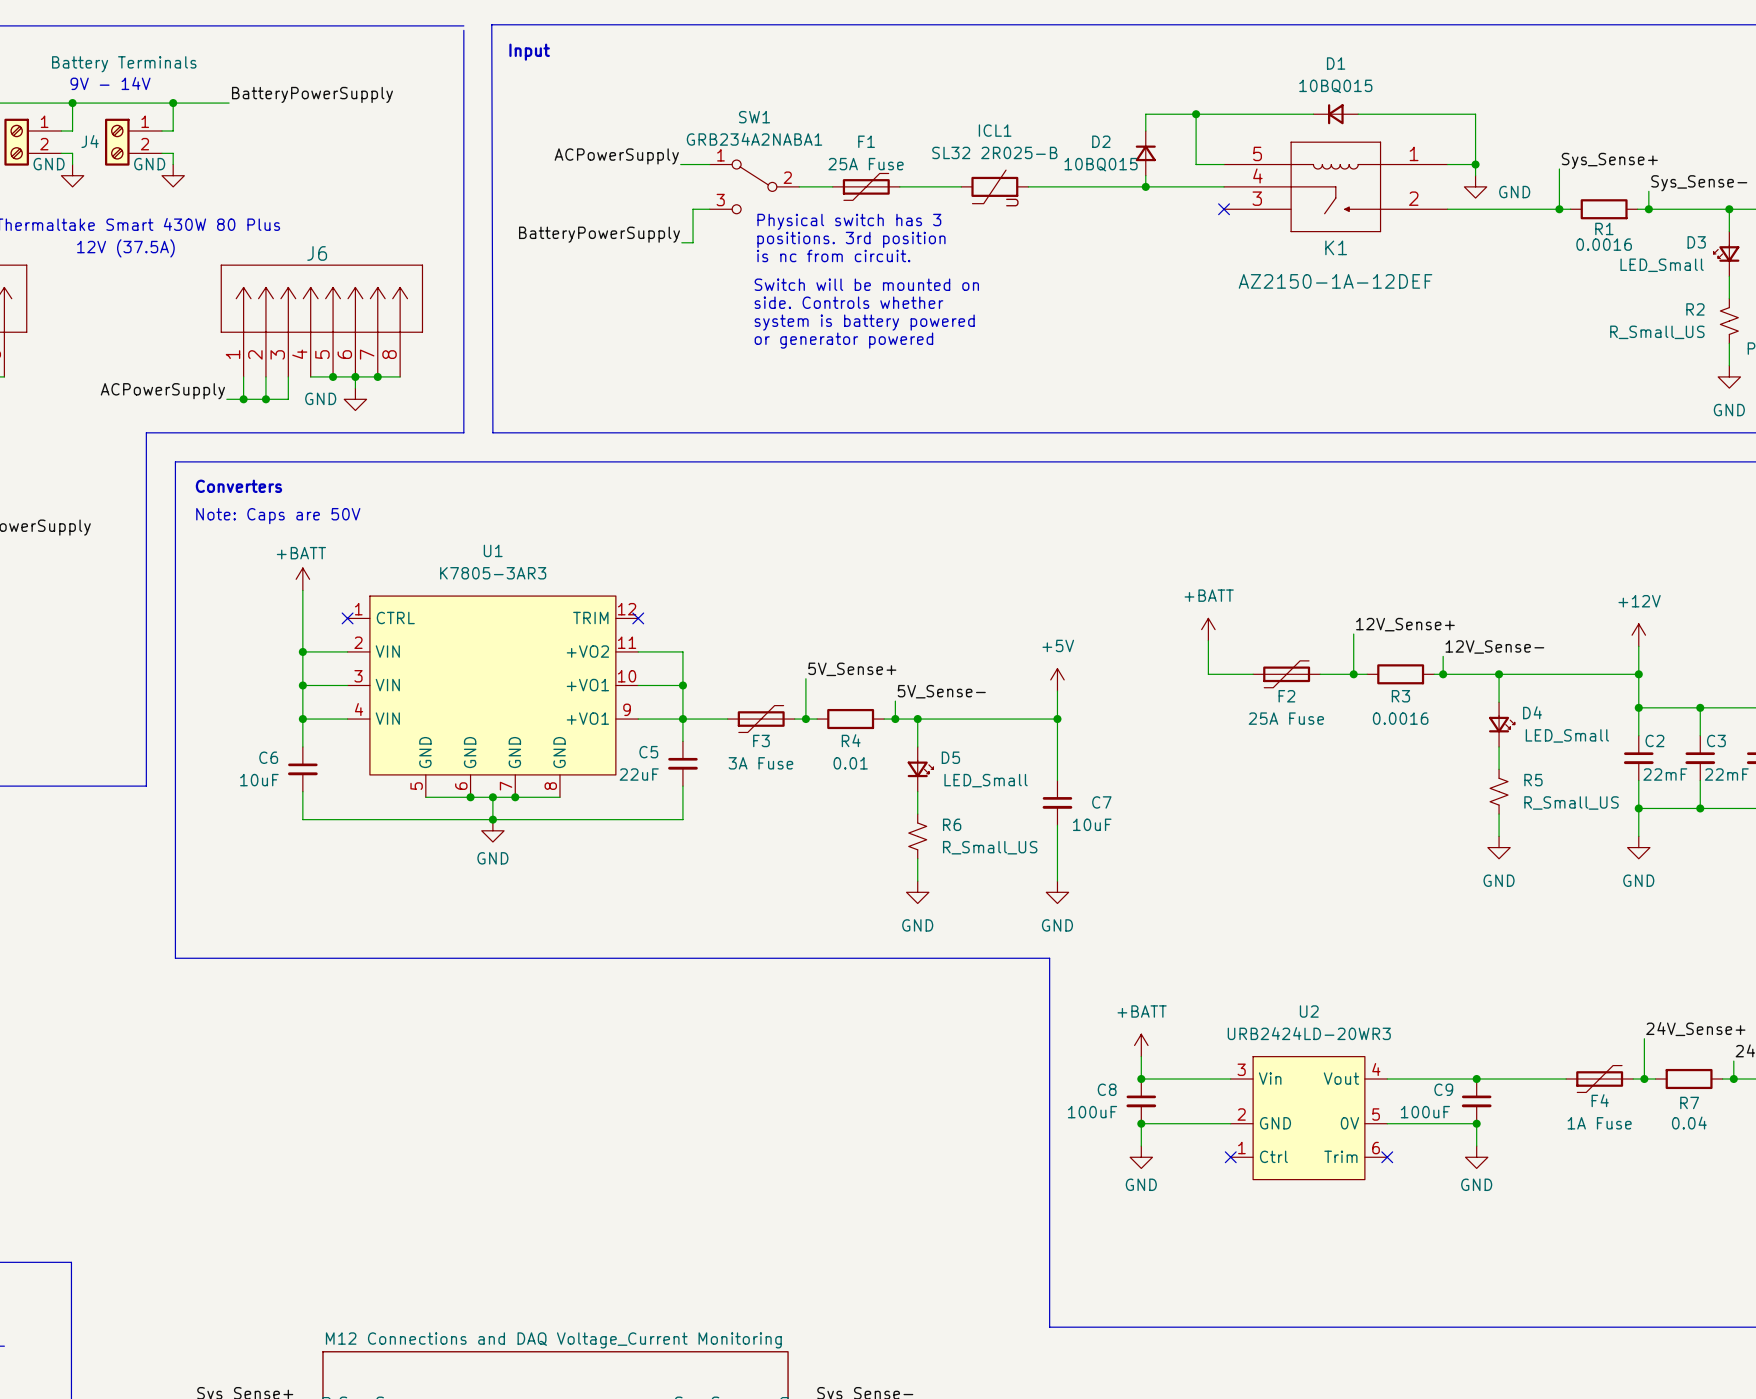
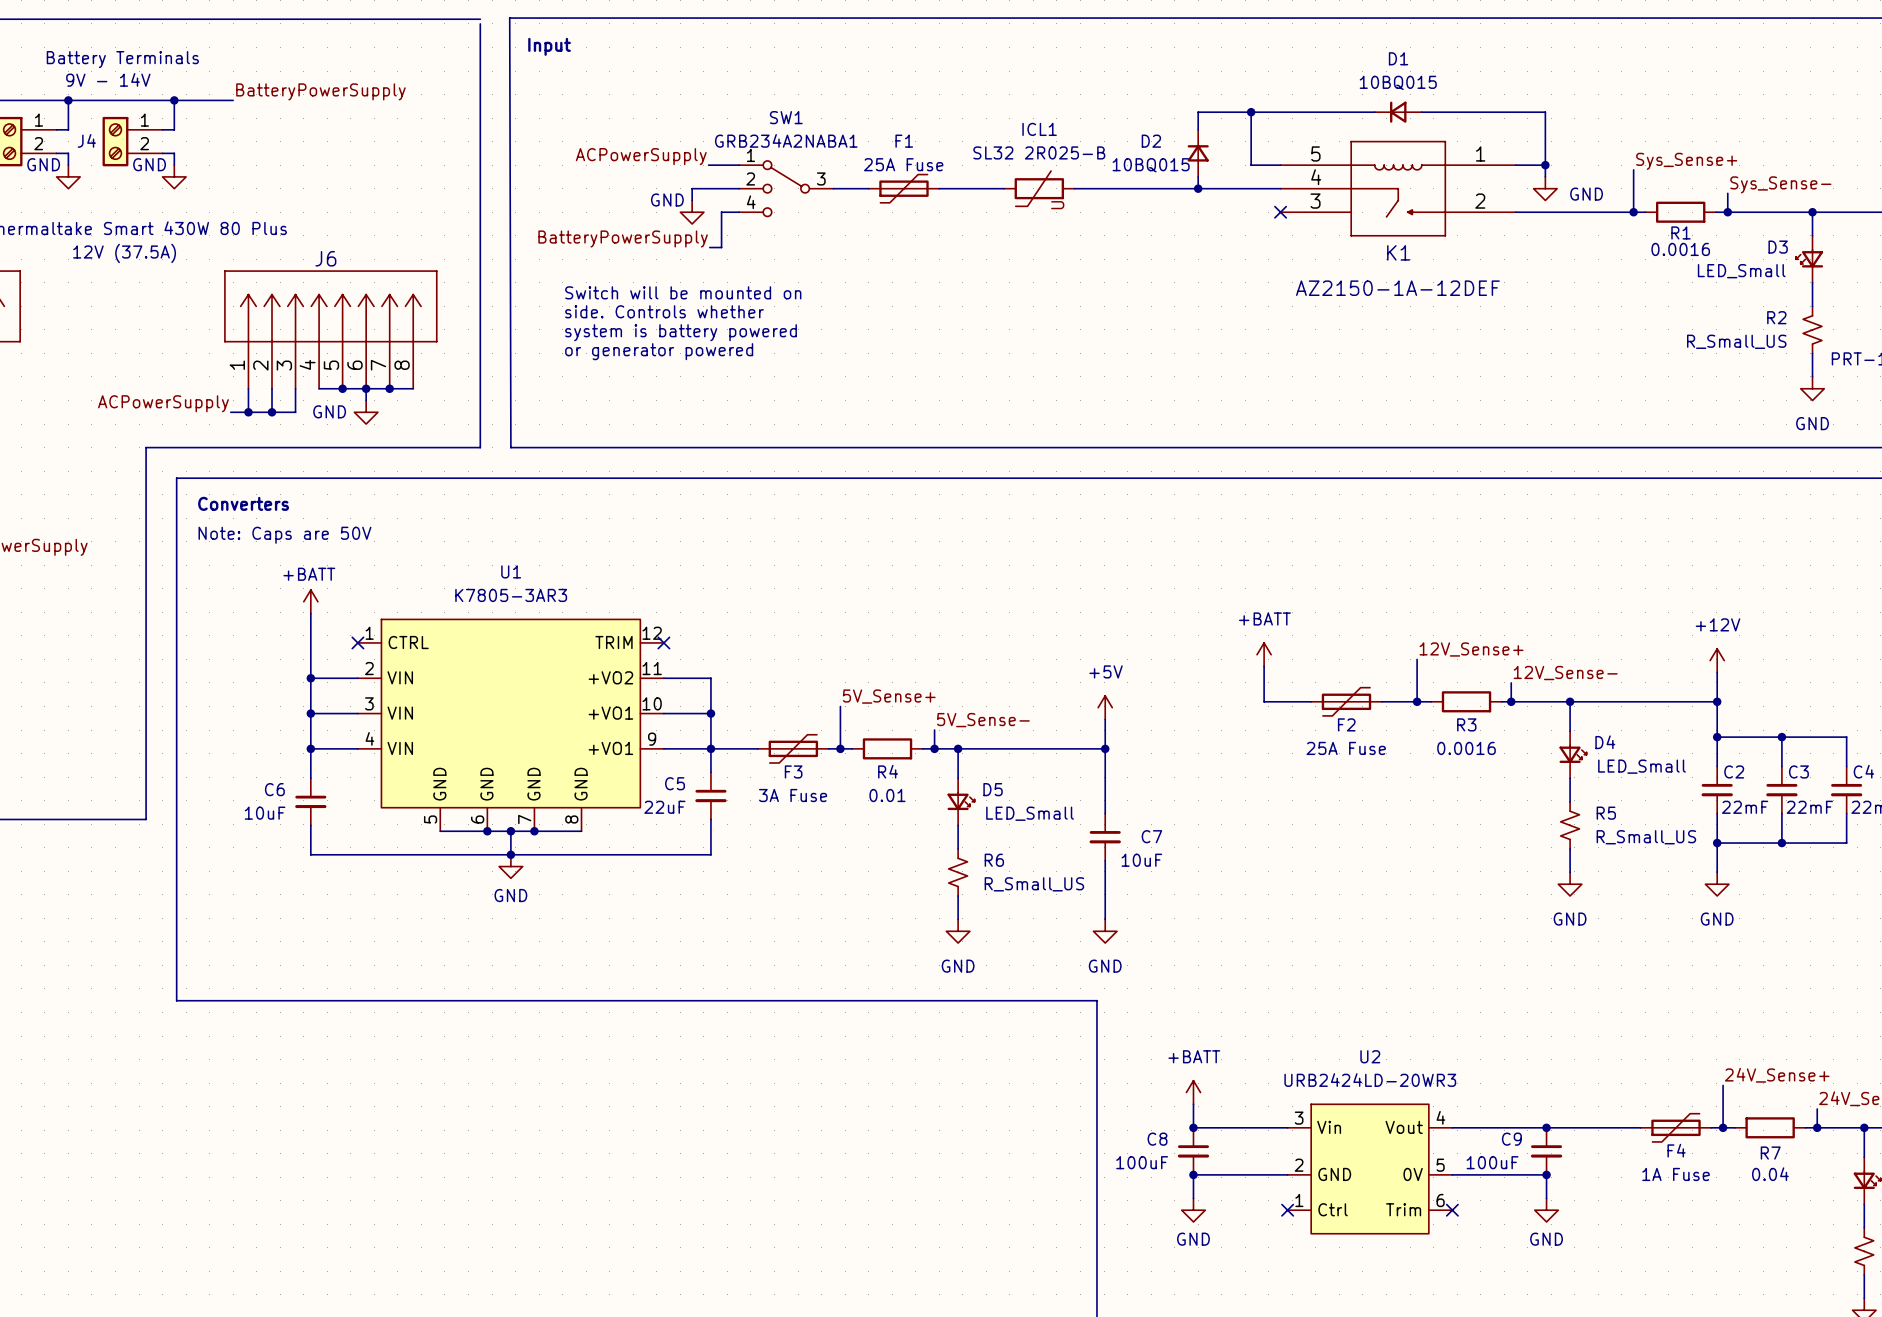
SW1 symbol: [709, 160, 800, 214] -> [739, 160, 834, 217]
wire: none -> (739, 188) (692, 188) (692, 200)
power symbol: none -> GND (692, 212)
text: Physical switch has 3 (849, 221) -> none
text: positions. 3rd position (851, 239) -> none
text: is nc from circuit. (833, 255) -> none
text position: Switch will be mounted on (866, 284) -> Switch will be mounted on (683, 292)
text position: side. Controls whether (848, 302) -> side. Controls whether (664, 311)
text position: system is battery powered (864, 322) -> system is battery powered (681, 332)
text position: or generator powered (843, 340) -> or generator powered (659, 351)

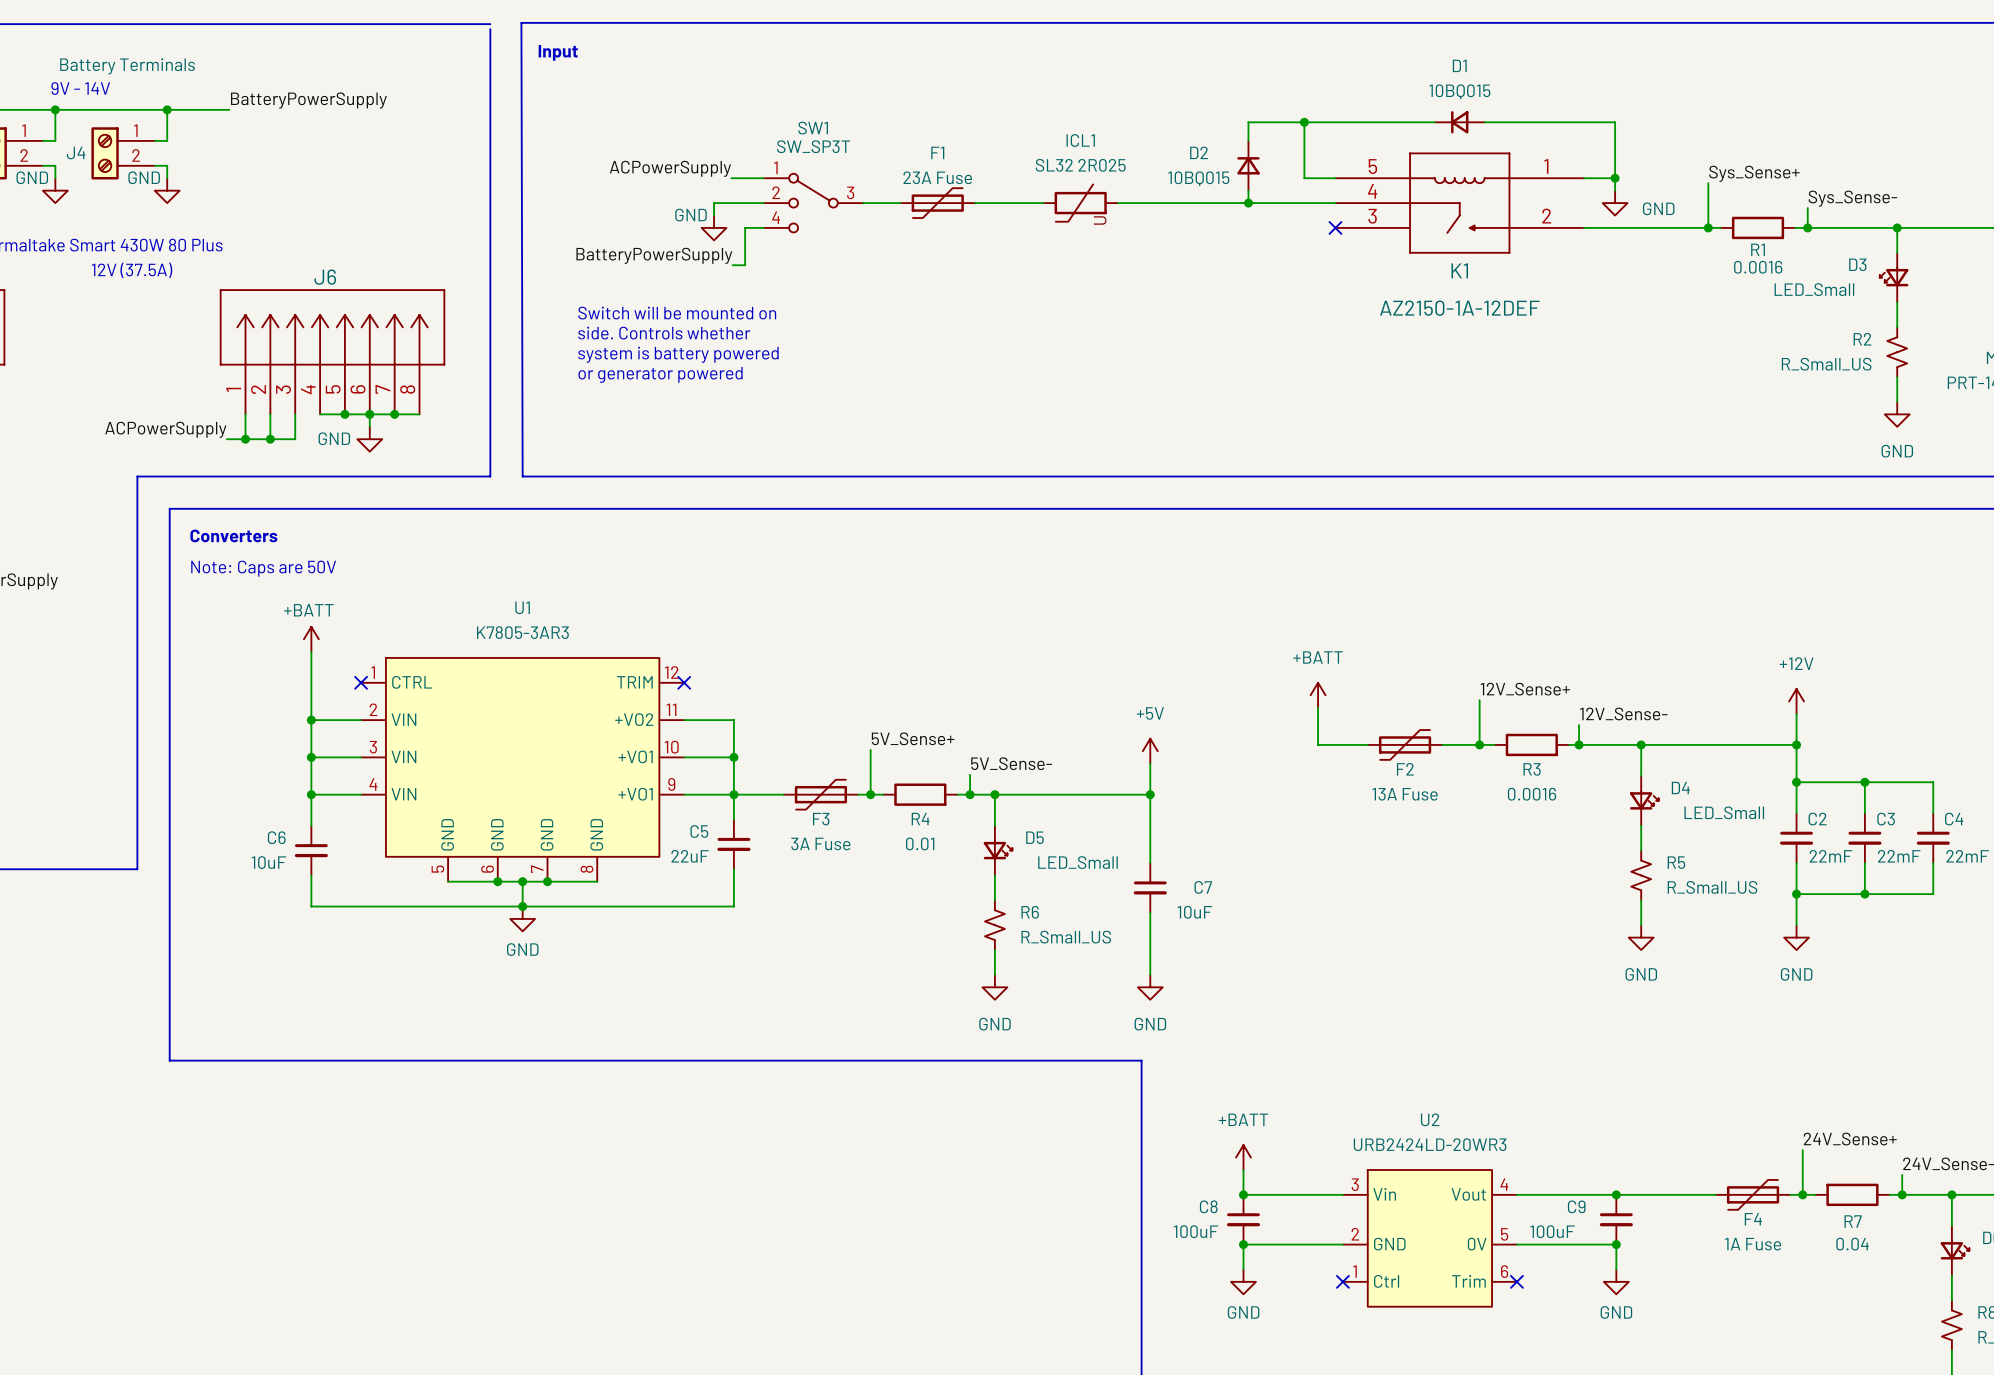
SW1 value: GRB234A2NABA1 (786, 140) -> SW_SP3T (813, 146)
ICL1 value: SL32 2R025-B (1039, 152) -> SL32 2R025 (1080, 165)
F1 value: 25A Fuse (903, 164) -> 23A Fuse (937, 177)
F2 value: 25A Fuse (1346, 748) -> 13A Fuse (1405, 794)

